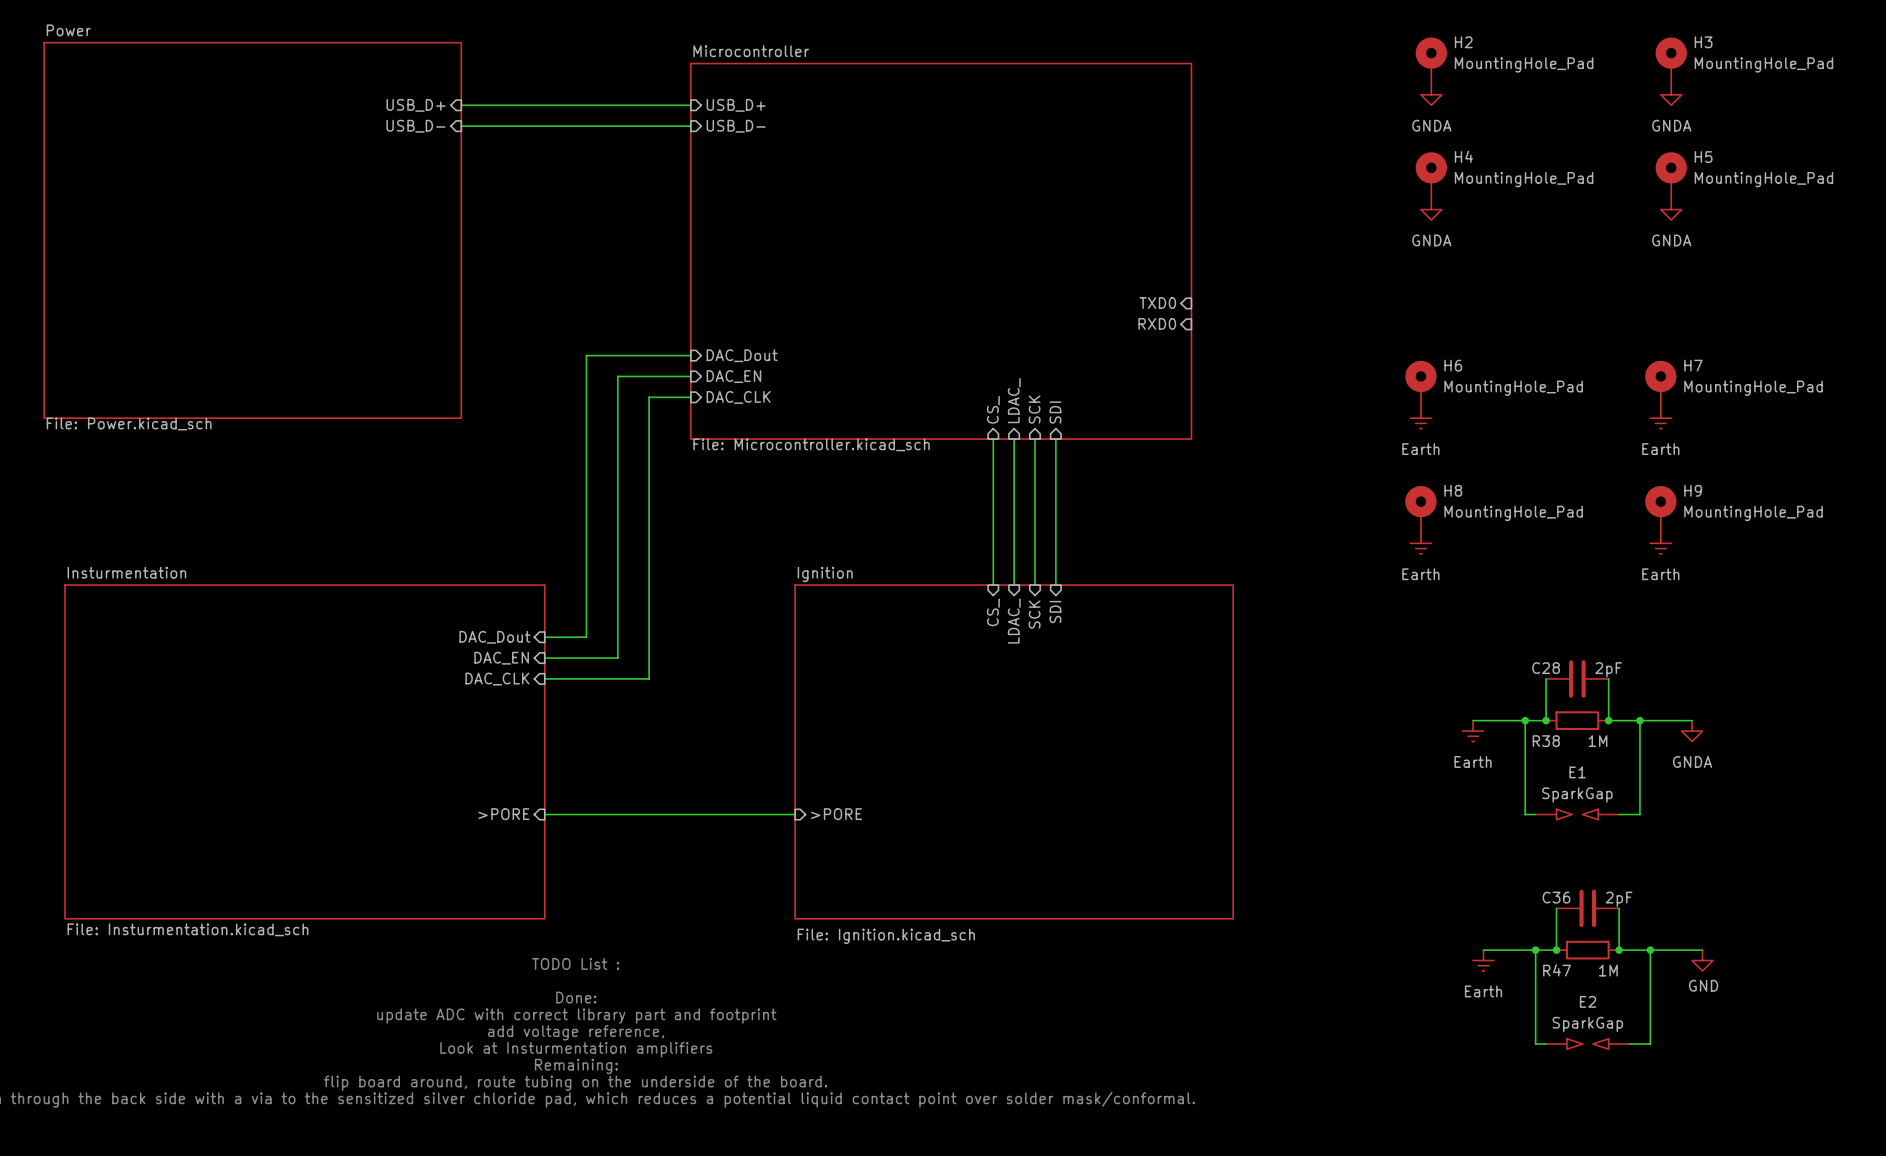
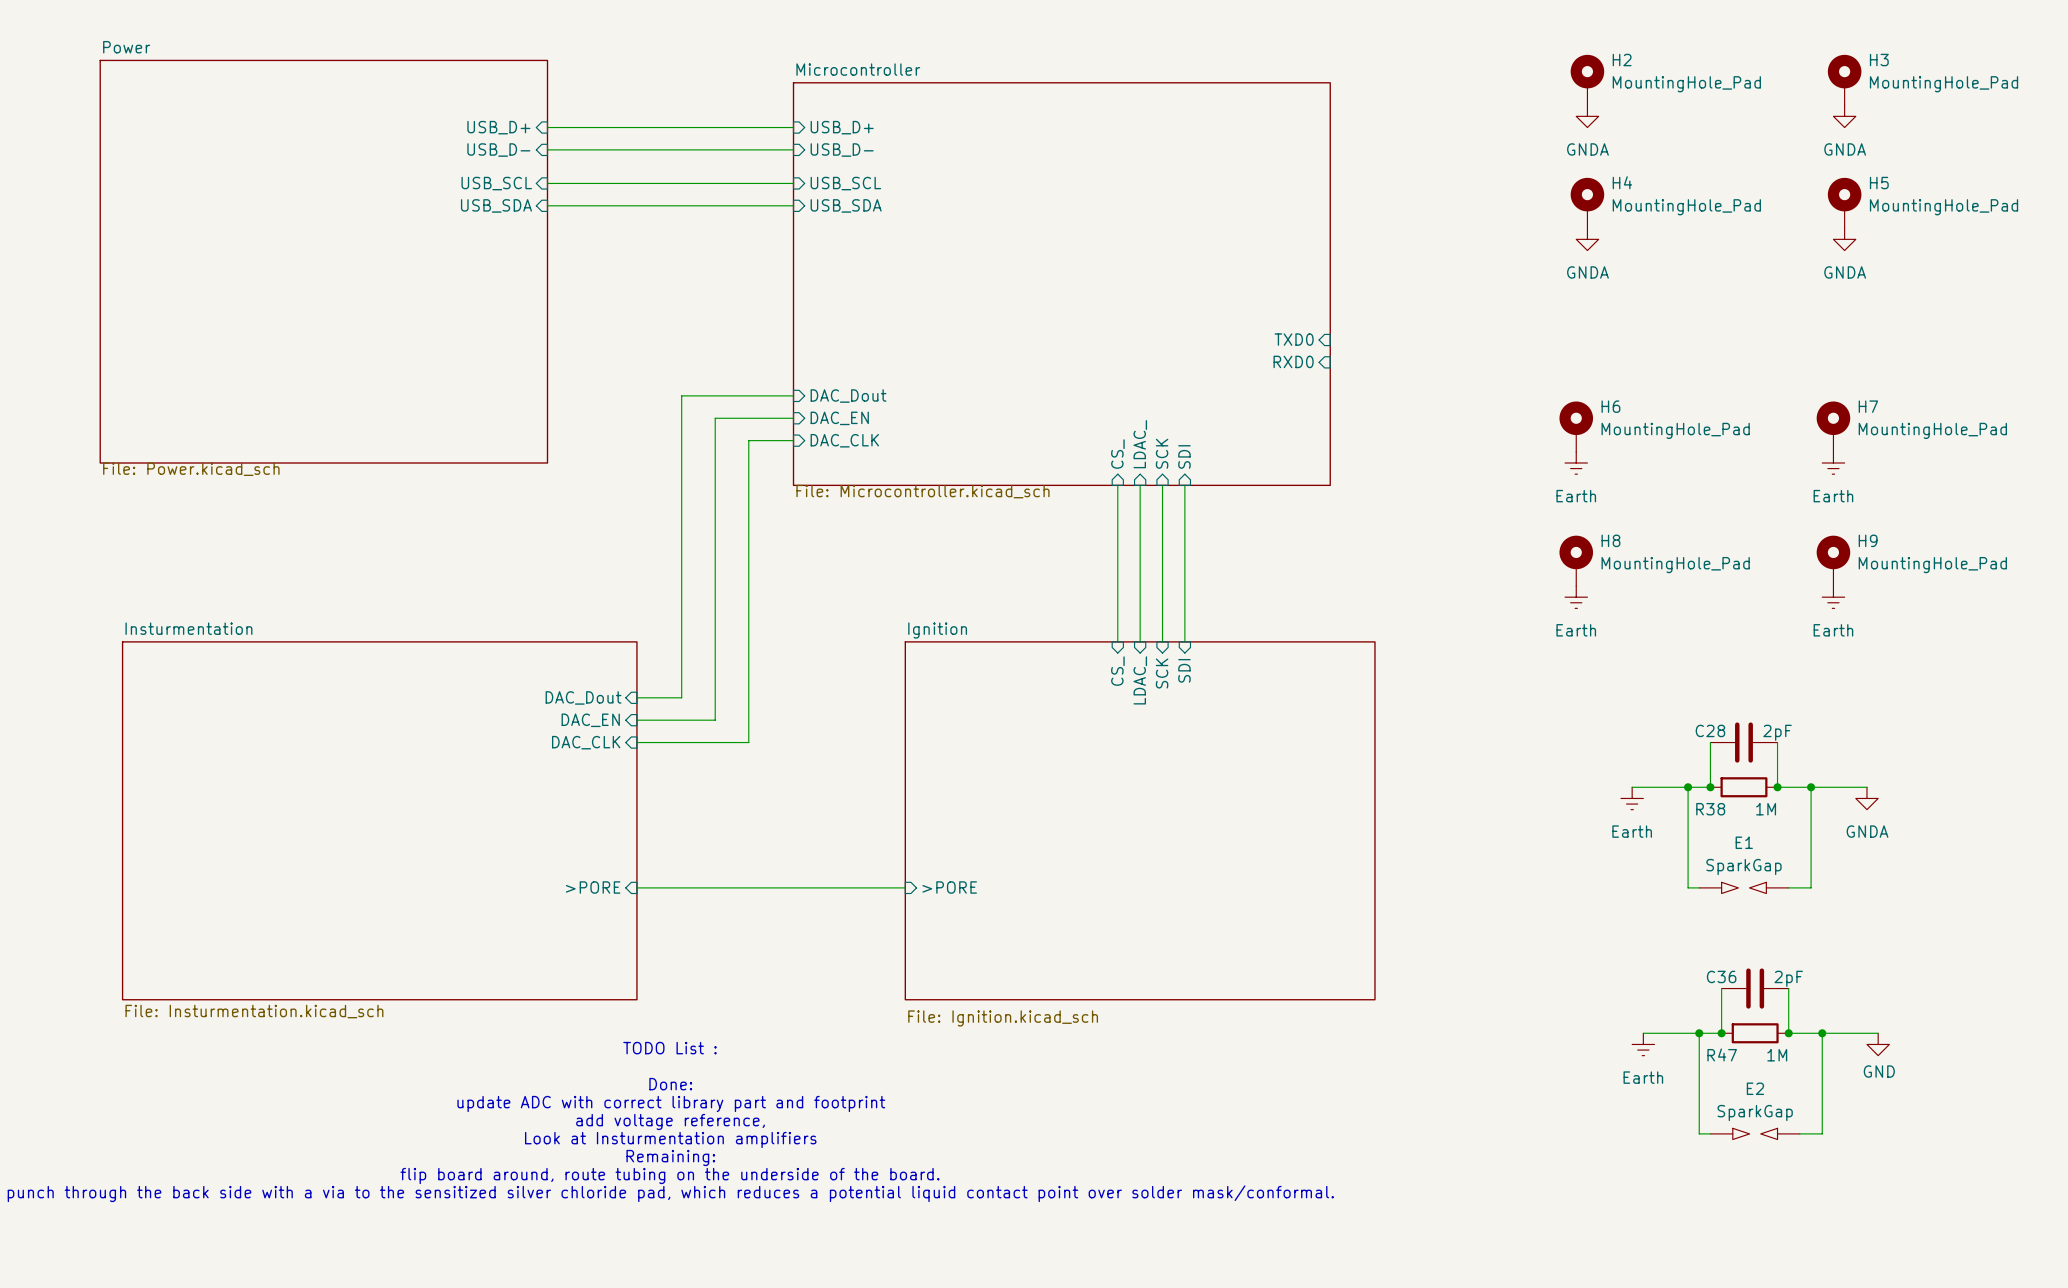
sheet pin: none -> USB_SCL (496, 183)
wire: none -> (547, 183) (793, 183)
sheet pin: none -> USB_SCL (845, 183)
sheet pin: none -> USB_SDA (496, 205)
wire: none -> (547, 205) (793, 205)
sheet pin: none -> USB_SDA (846, 205)

